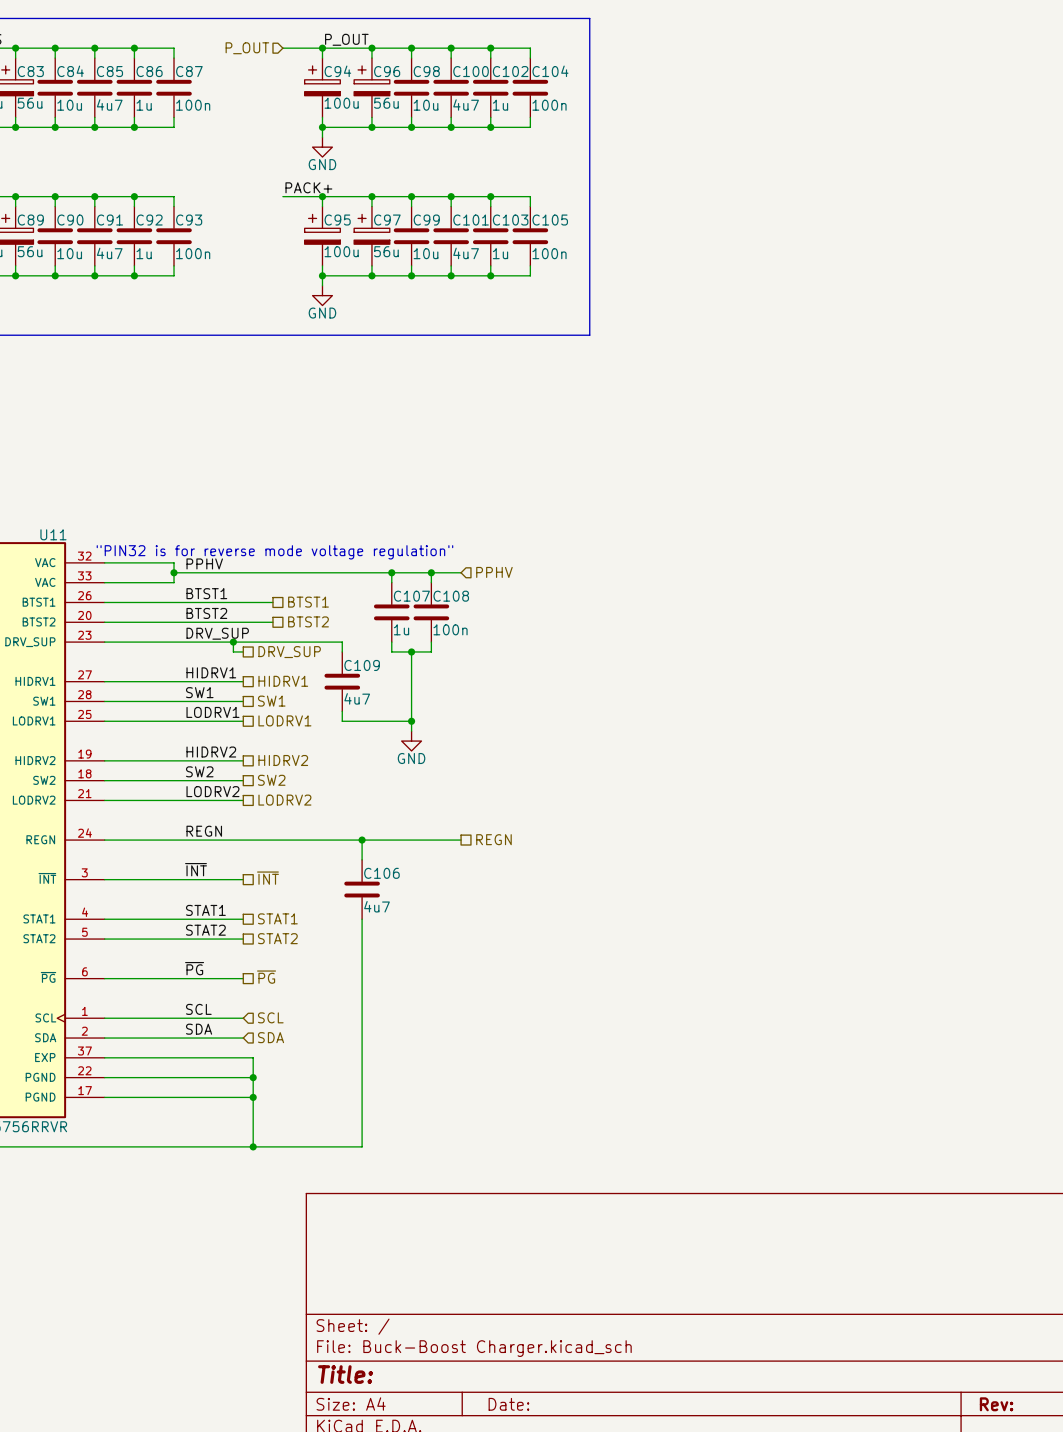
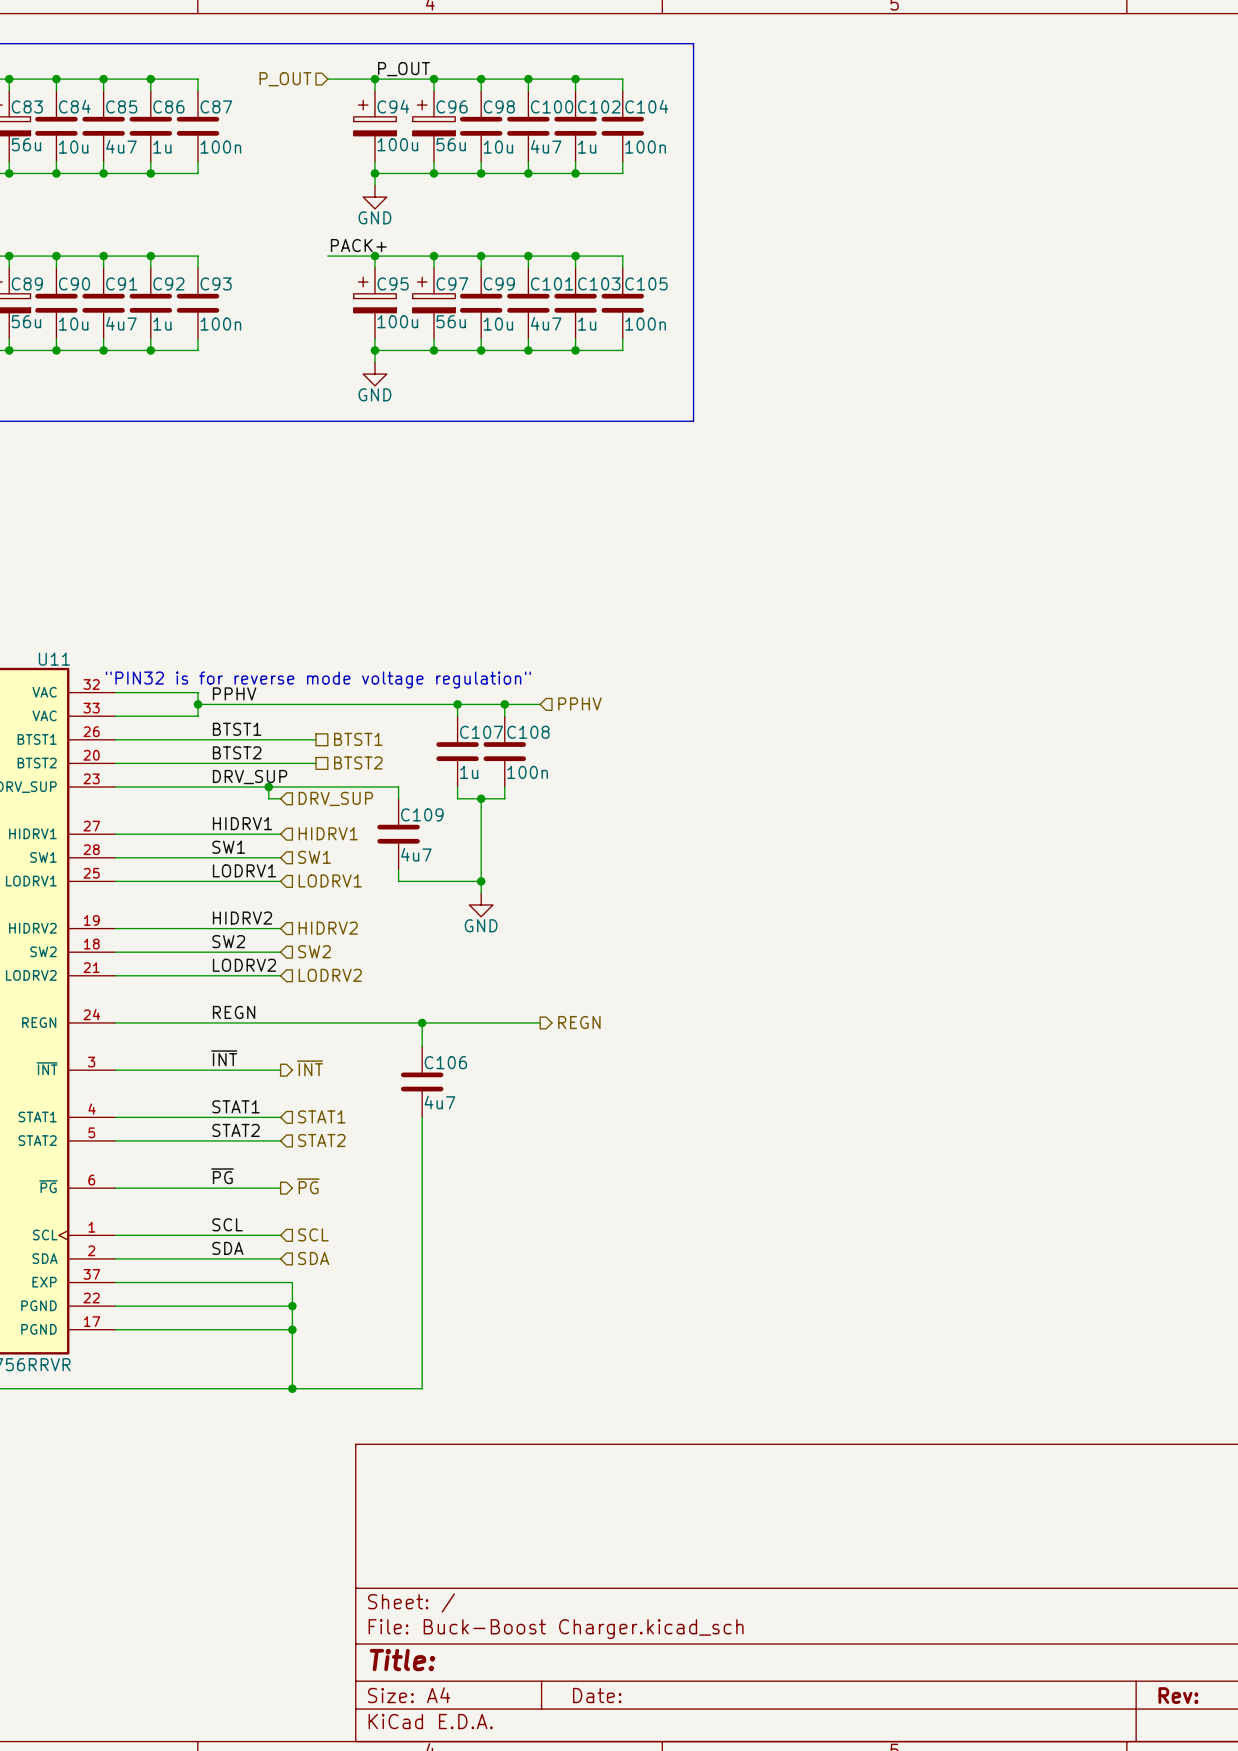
hierarchical label shape: passive (289, 652) -> input (335, 798)
hierarchical label shape: passive (283, 681) -> input (328, 833)
hierarchical label shape: passive (271, 701) -> input (314, 857)
hierarchical label shape: passive (284, 720) -> input (330, 880)
hierarchical label shape: passive (283, 760) -> input (328, 928)
hierarchical label shape: passive (271, 780) -> input (314, 951)
hierarchical label shape: passive (284, 800) -> input (330, 975)
hierarchical label shape: passive (493, 839) -> output (579, 1022)
hierarchical label shape: passive (267, 878) -> output (310, 1068)
hierarchical label shape: passive (277, 918) -> input (321, 1116)
hierarchical label shape: passive (277, 938) -> input (321, 1140)
hierarchical label shape: passive (266, 977) -> output (308, 1186)

